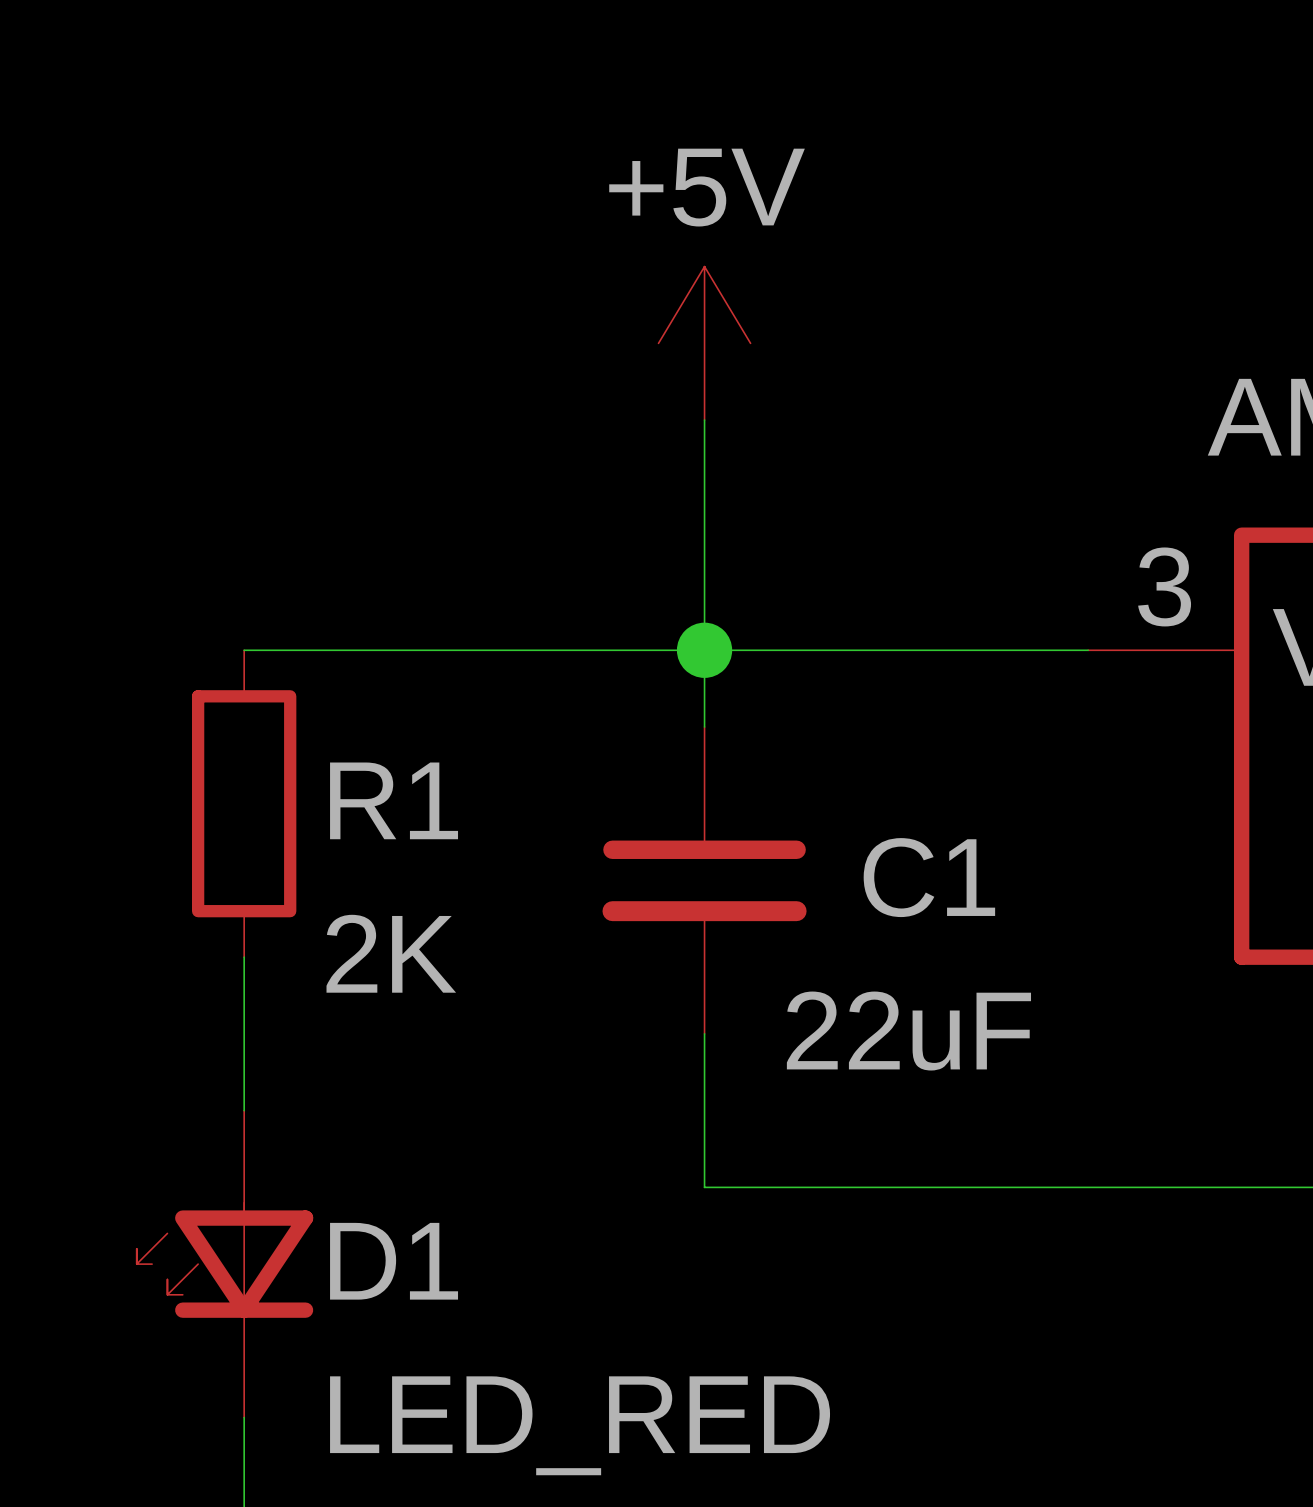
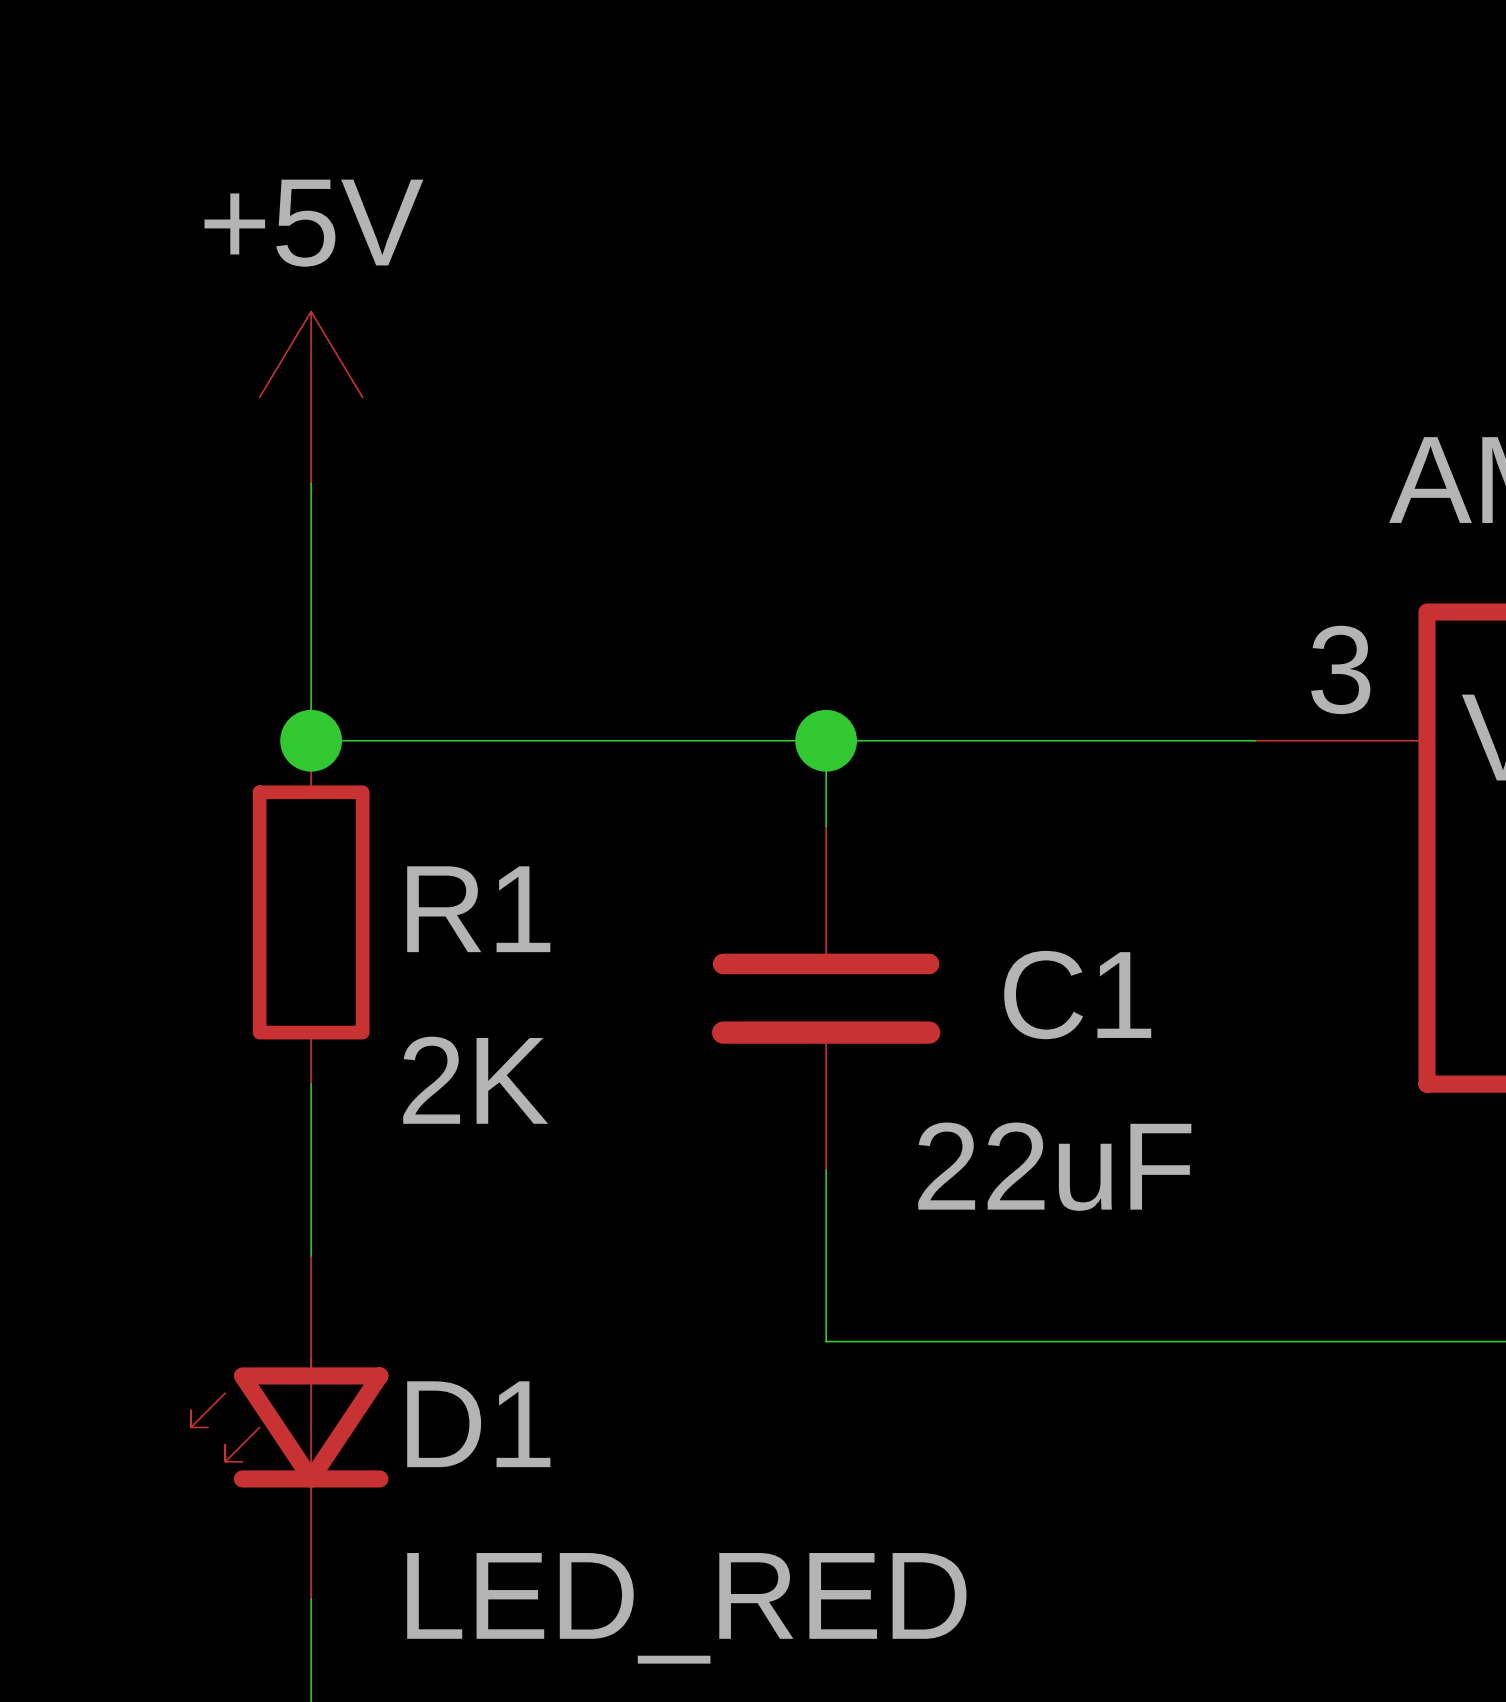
power symbol position: +5V (704, 343) -> +5V (311, 397)
wire: (704, 420) (704, 650) -> (311, 483) (311, 740)
junction: none -> (311, 740)

